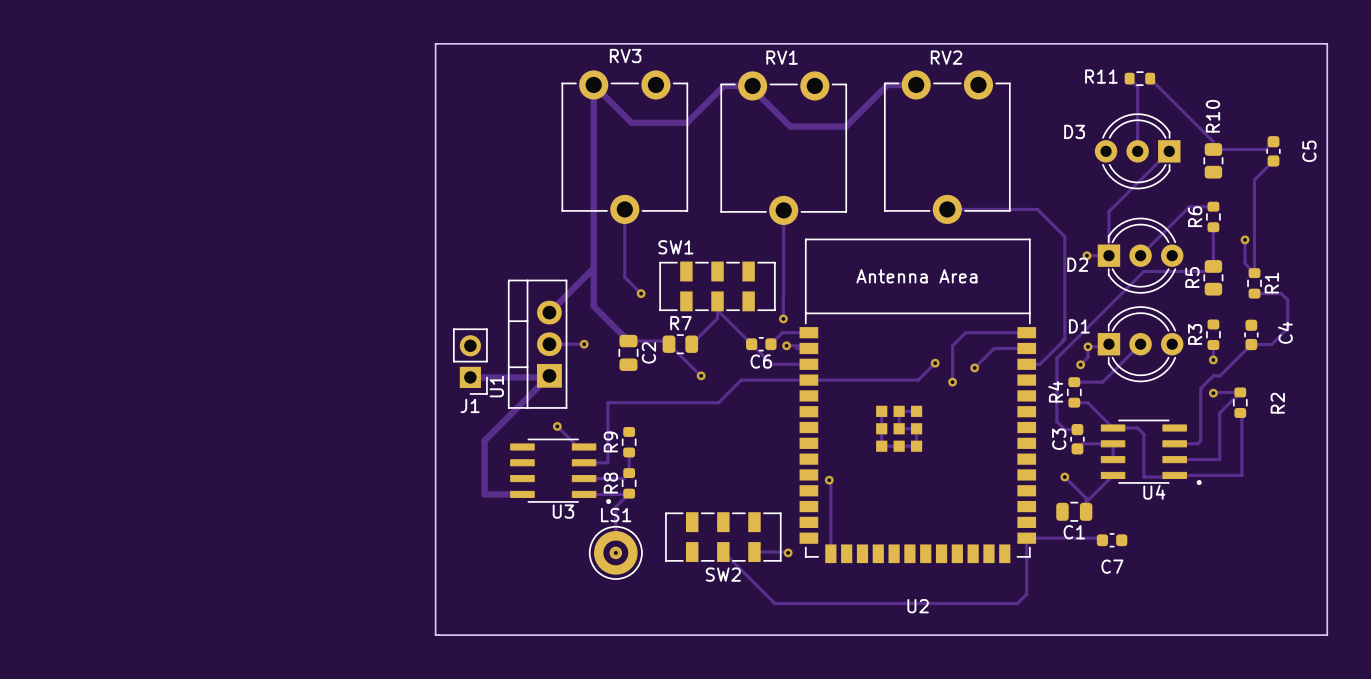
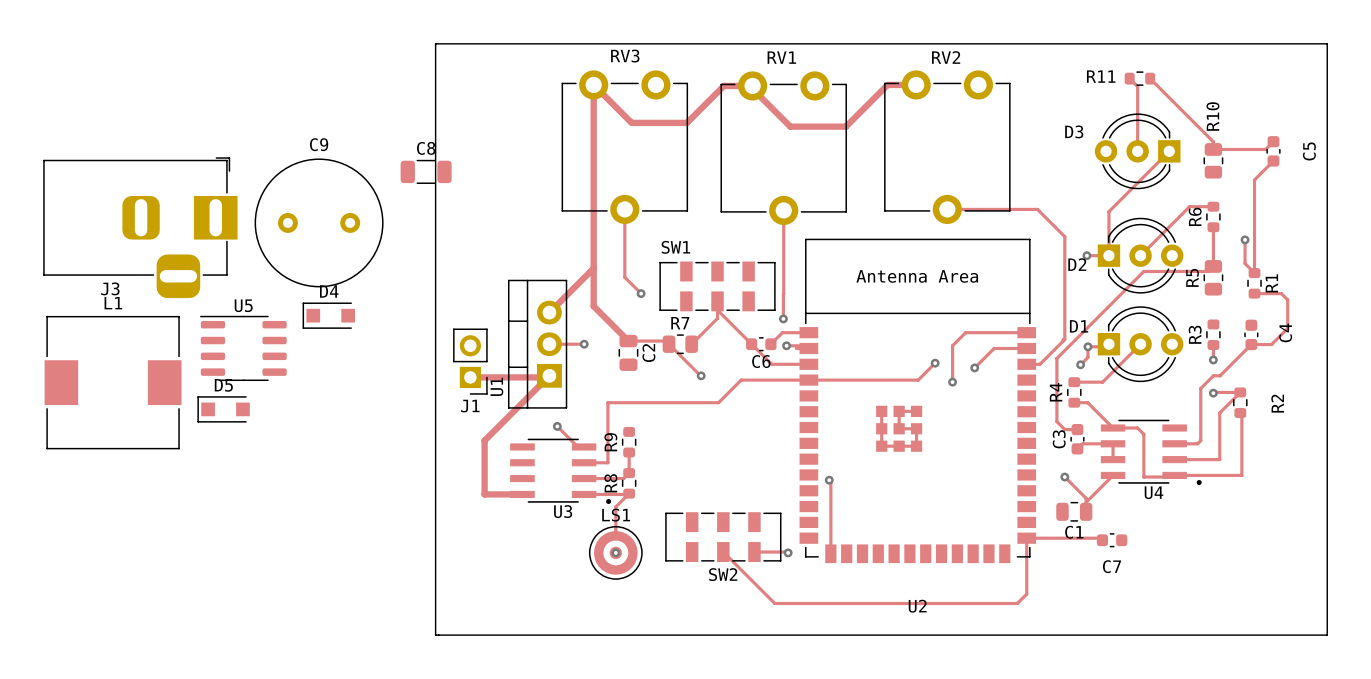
C8: none -> (426, 171)
C9: none -> (319, 222)
J3: none -> (140, 227)
D4: none -> (328, 315)
U5: none -> (243, 348)
L1: none -> (113, 382)
D5: none -> (223, 409)

